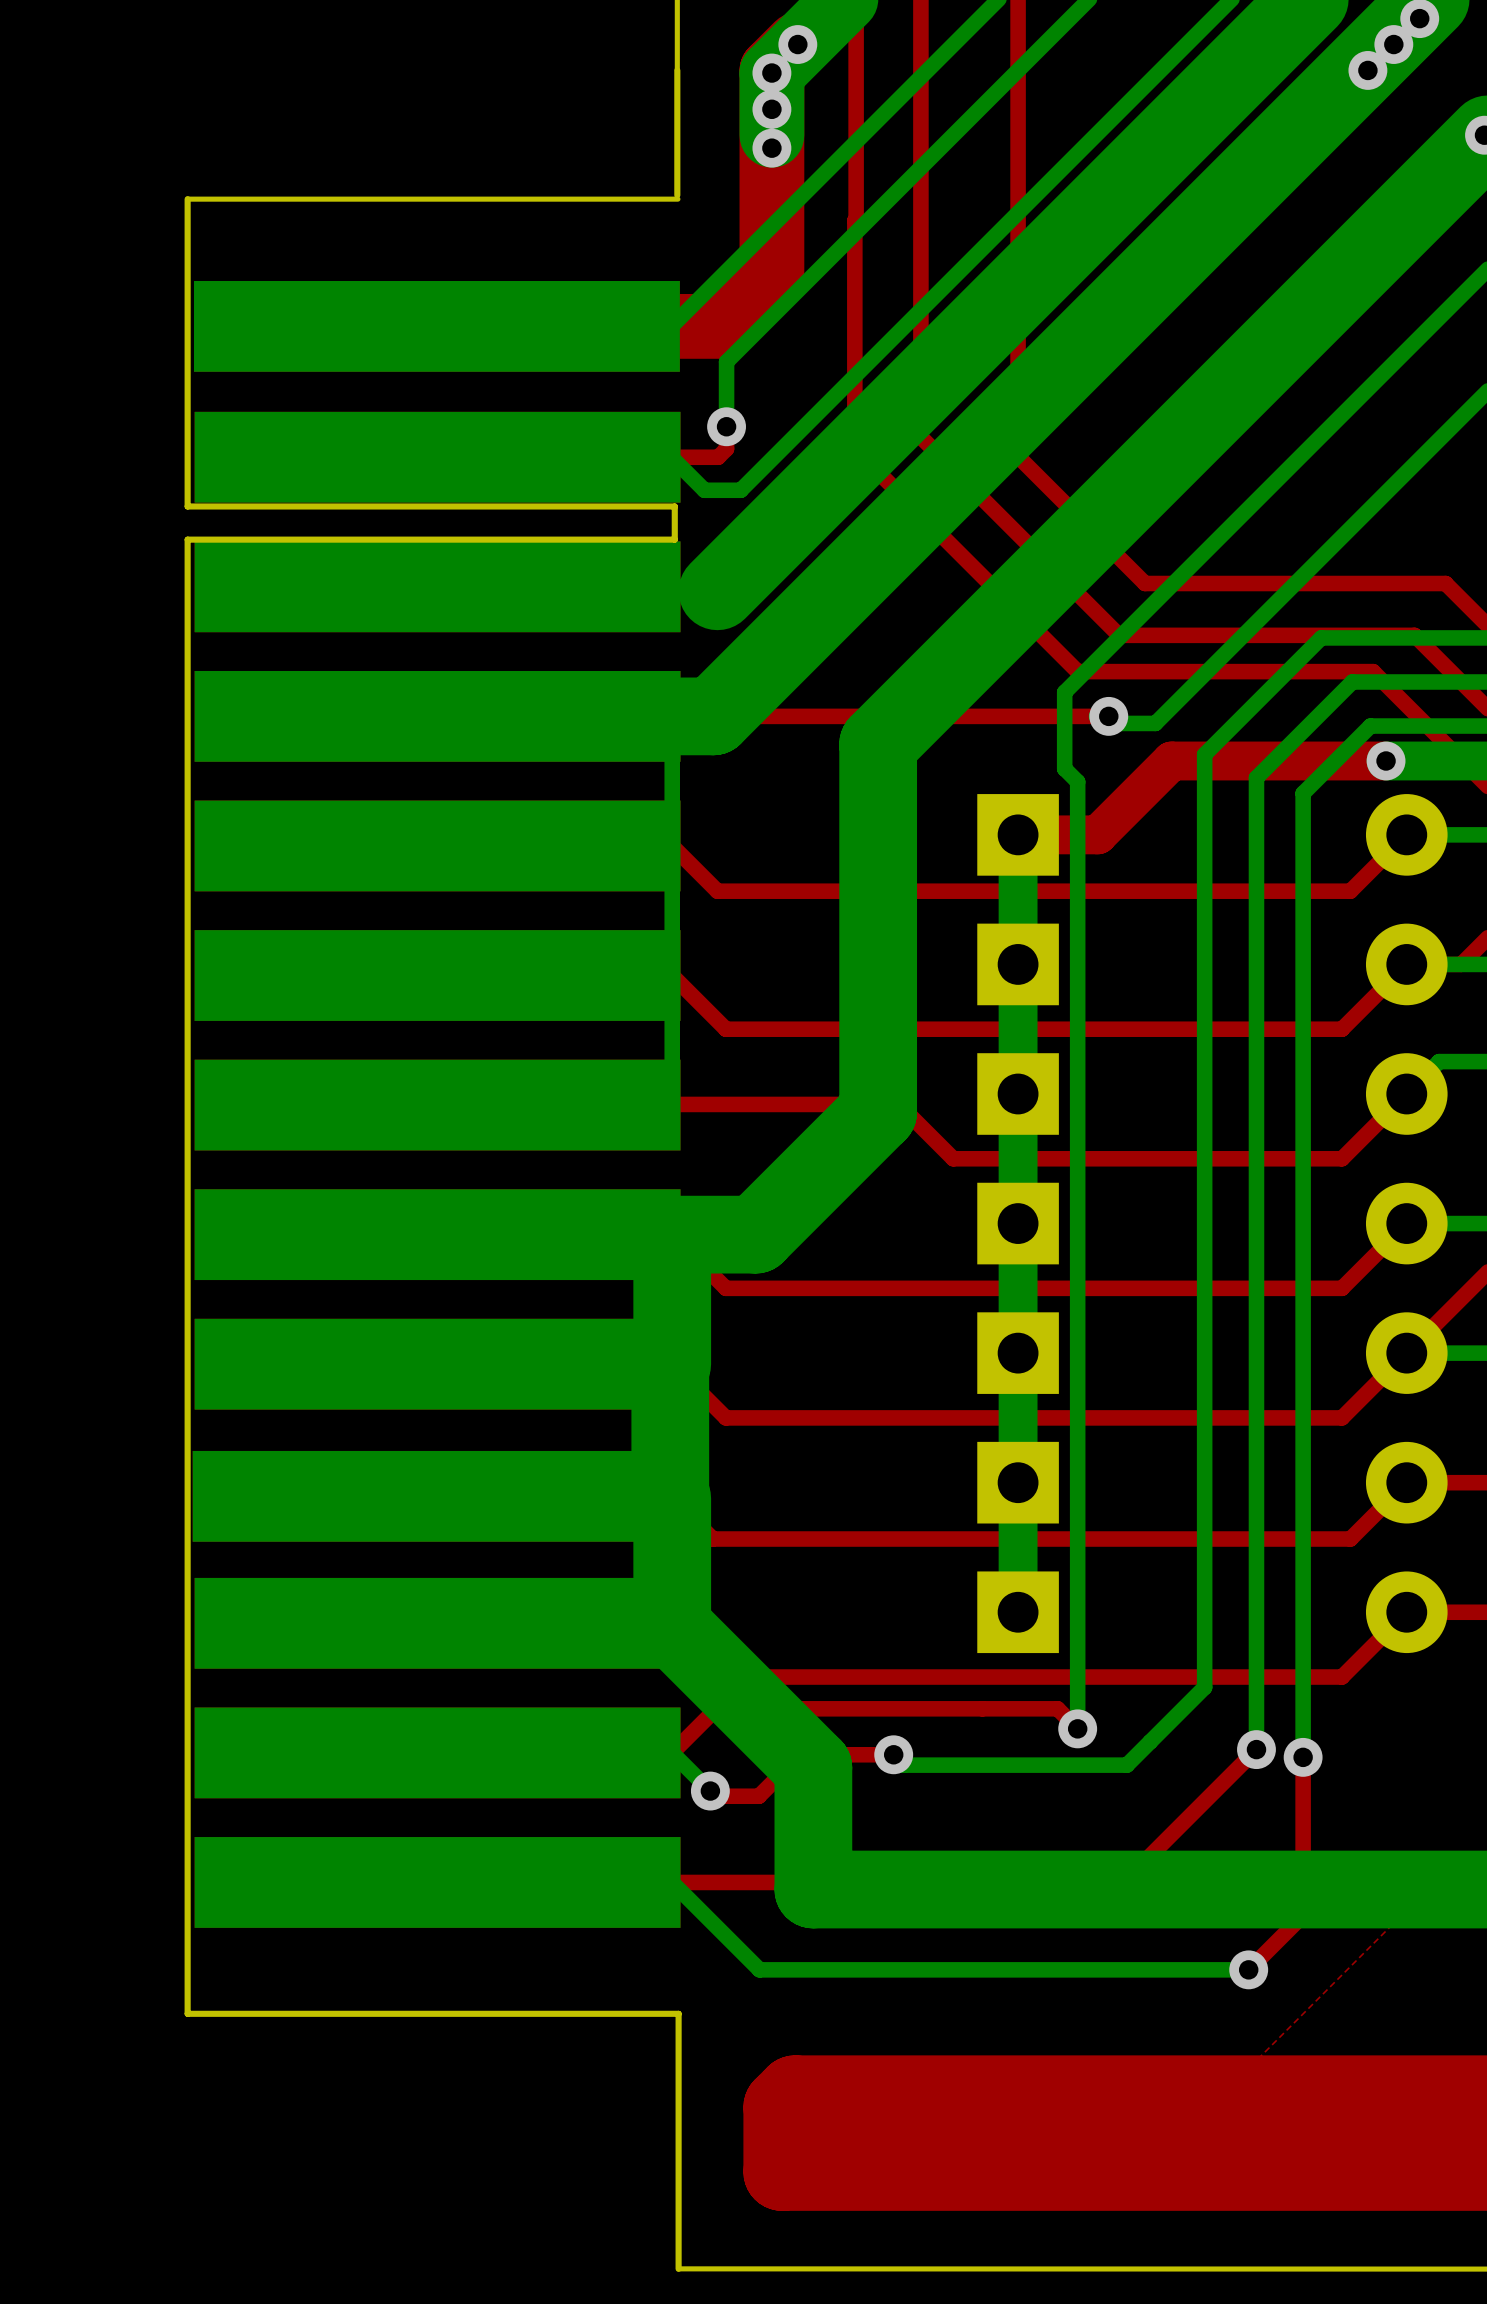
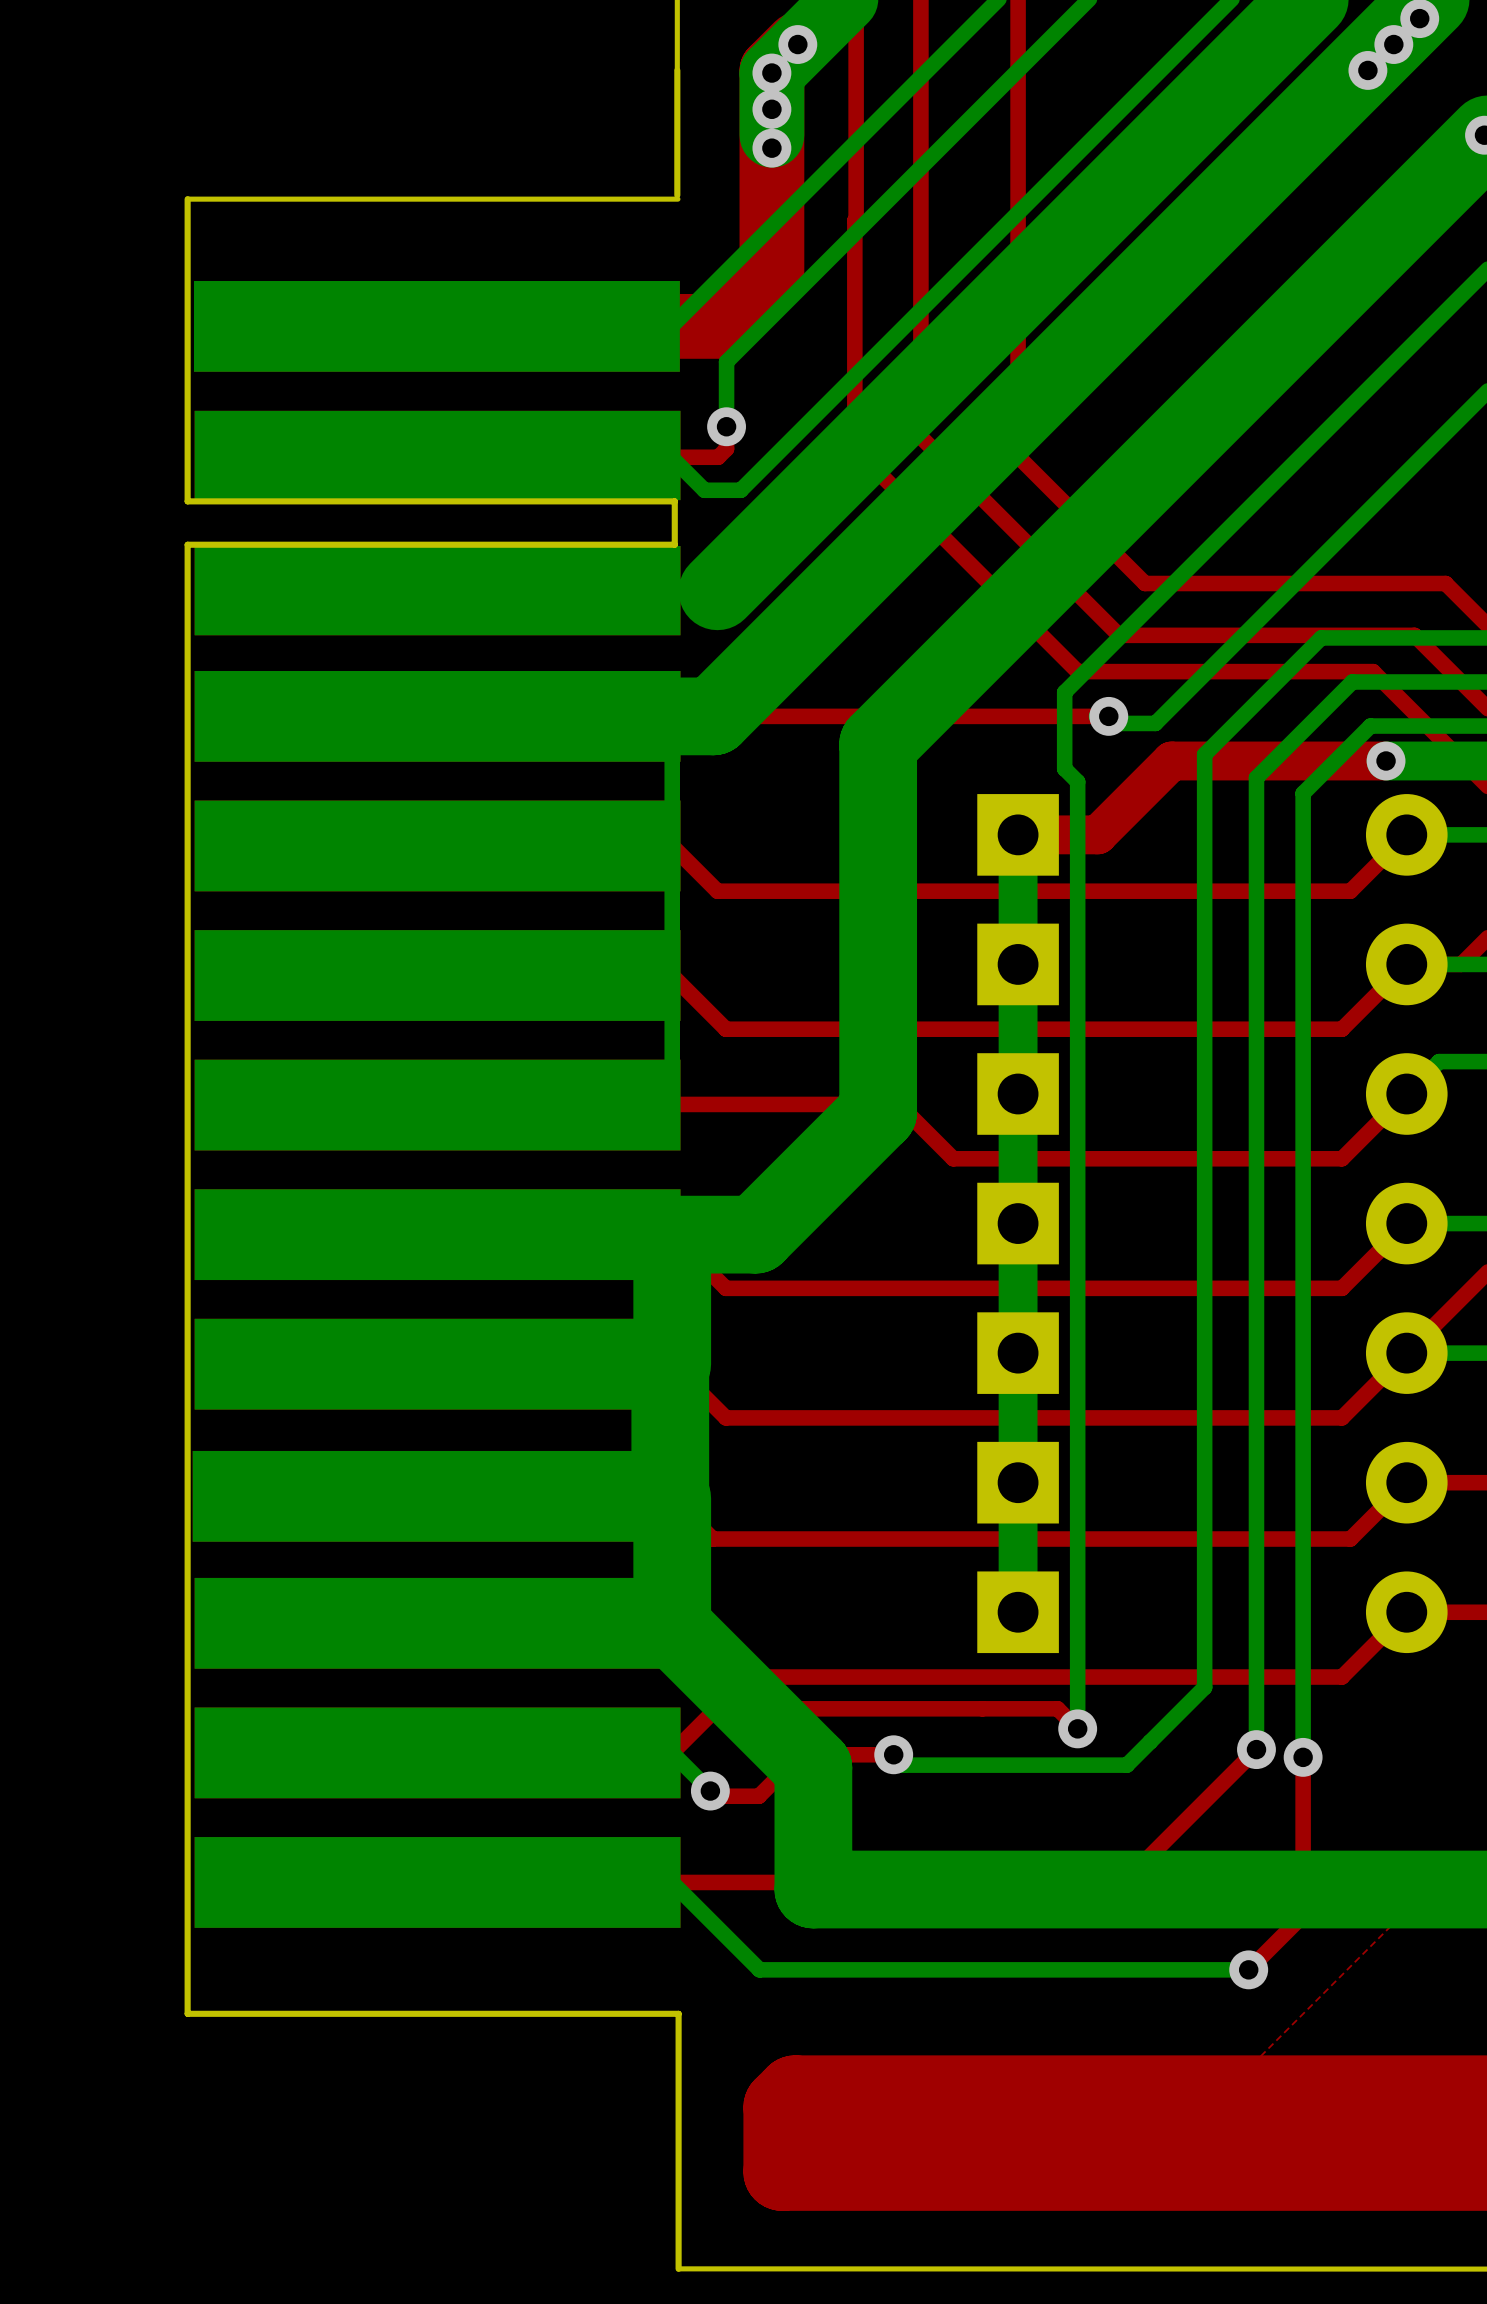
part footprint: [184, 67, 682, 2272] -> [184, 67, 682, 2272]

